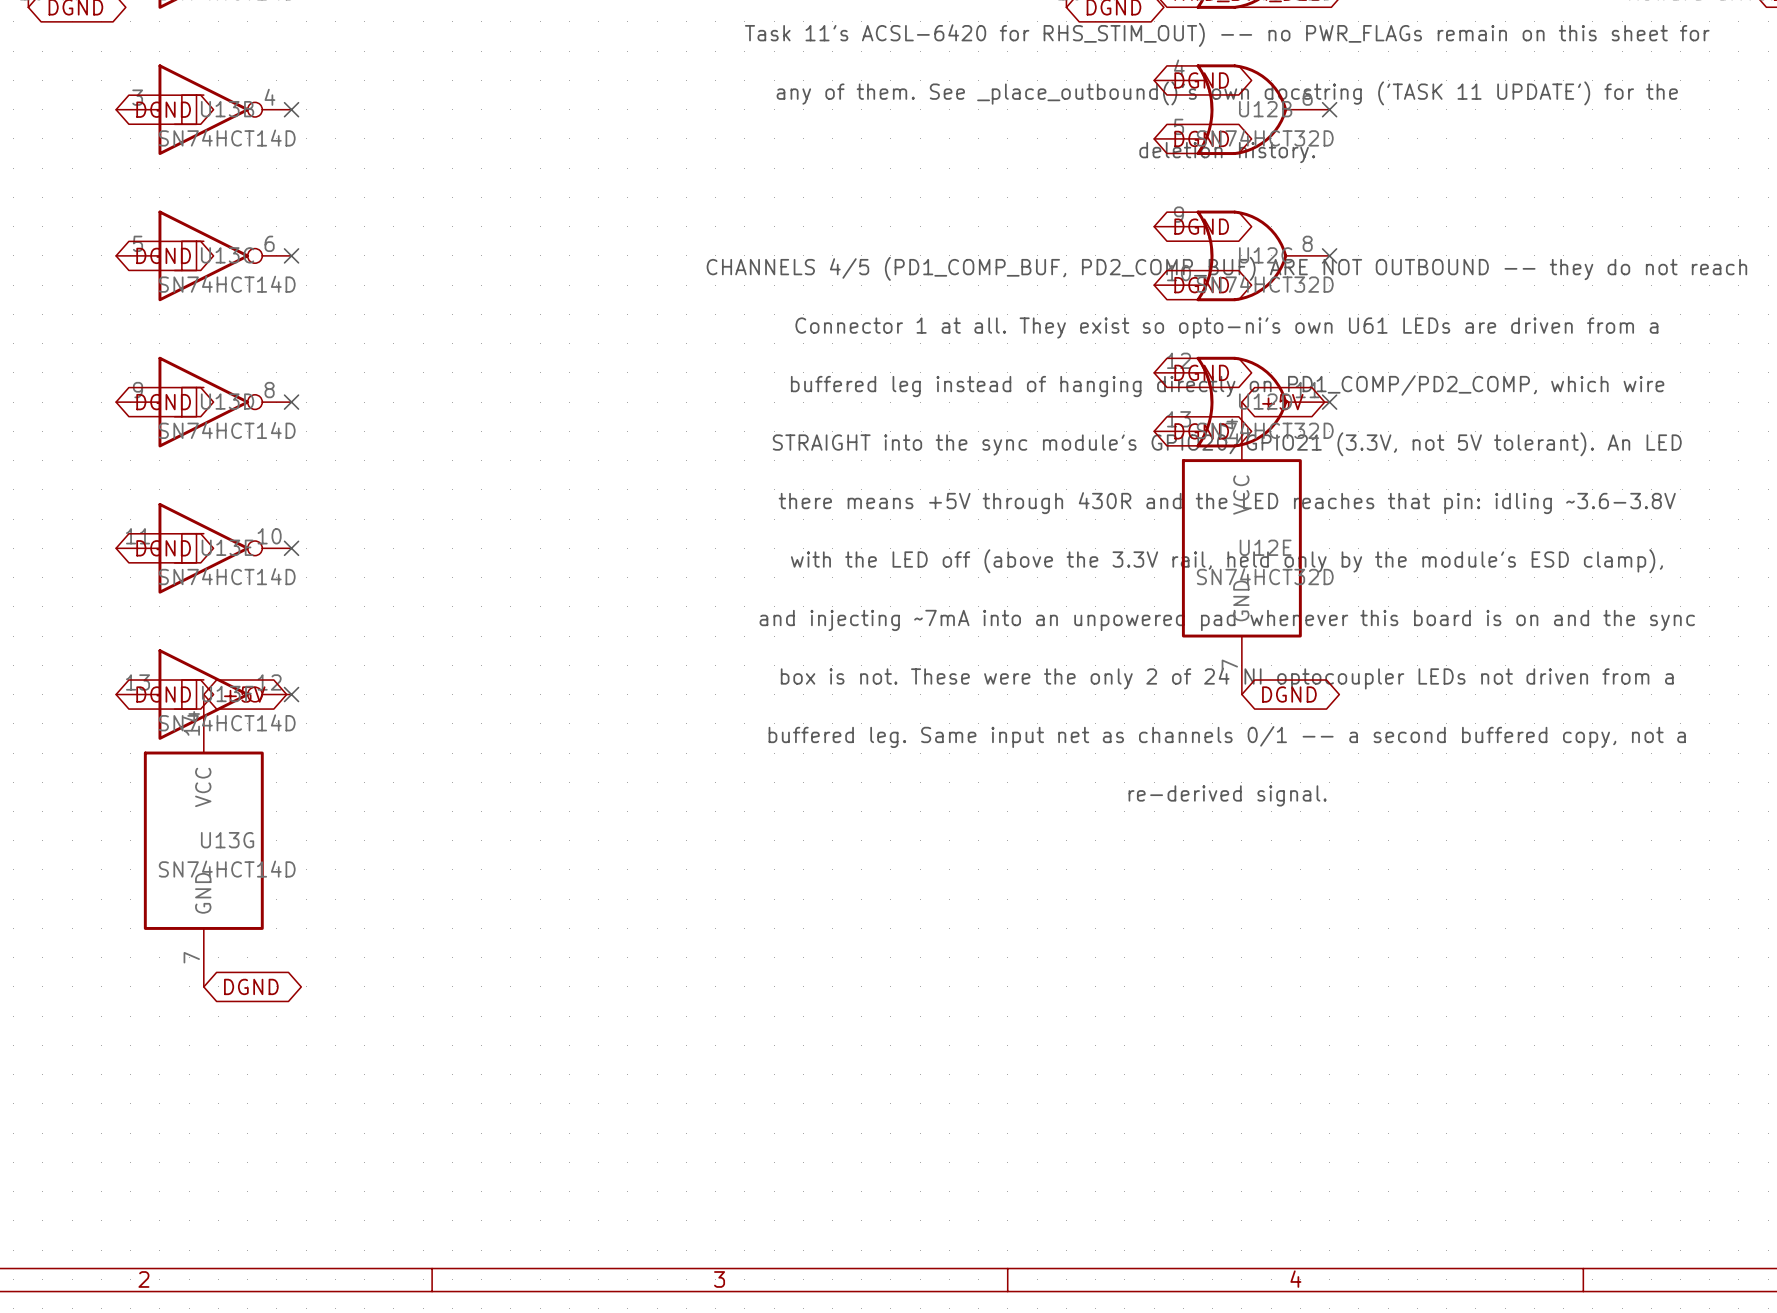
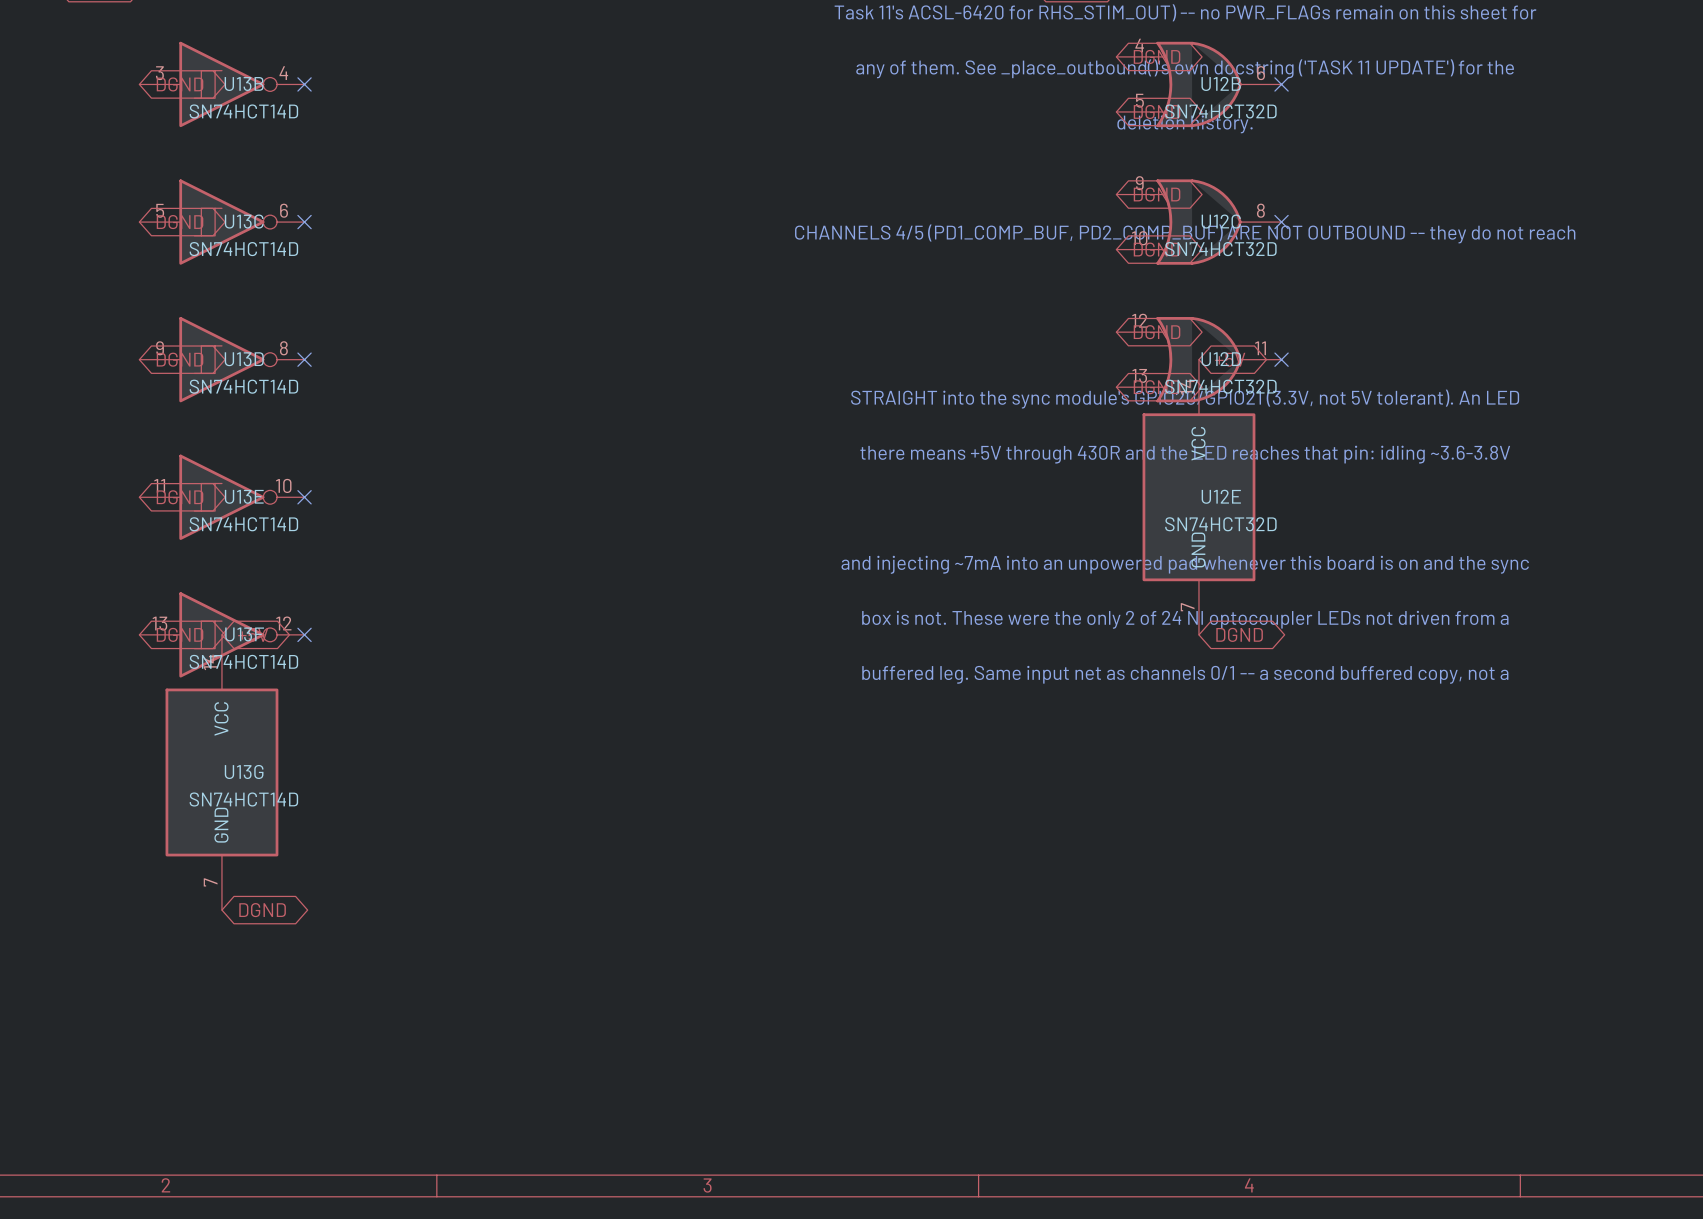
text: Connector 1 at all. They exist so opto-ni's own U61 LEDs are driven from a (1226, 328) -> none
text: buffered leg instead of hanging directly on PD1_COMP/PD2_COMP, which wire (1227, 386) -> none
text: with the LED off (above the 3.3V rail, held only by the module's ESD clamp), (1226, 561) -> none
text: re-derived signal. (1227, 795) -> none

